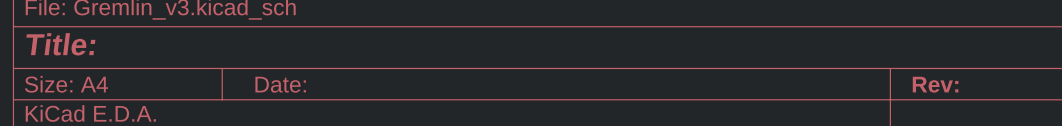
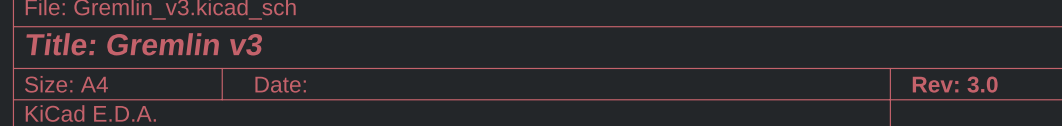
title block: Title: (60, 44) -> Title: Gremlin v3 (144, 44)
title block: Rev: (935, 84) -> Rev: 3.0 (955, 84)

